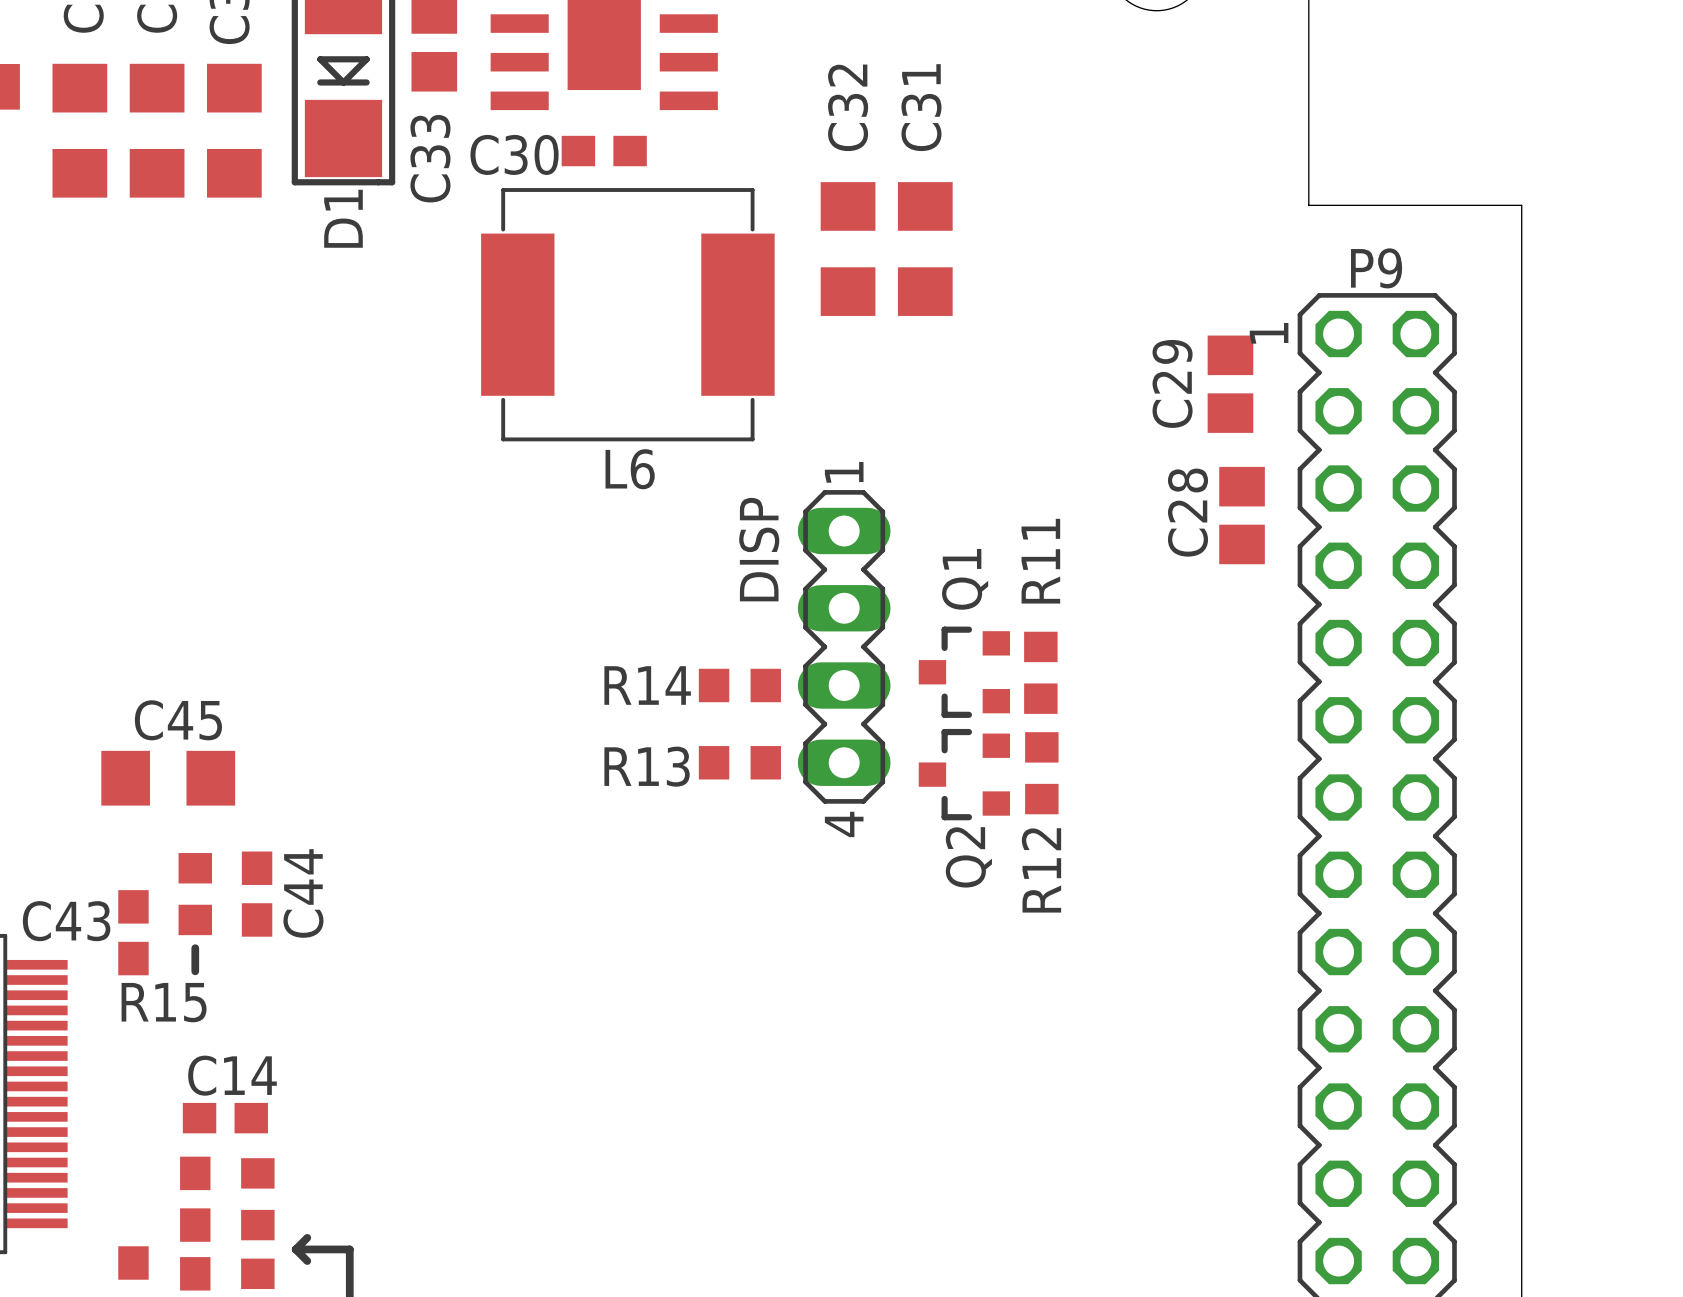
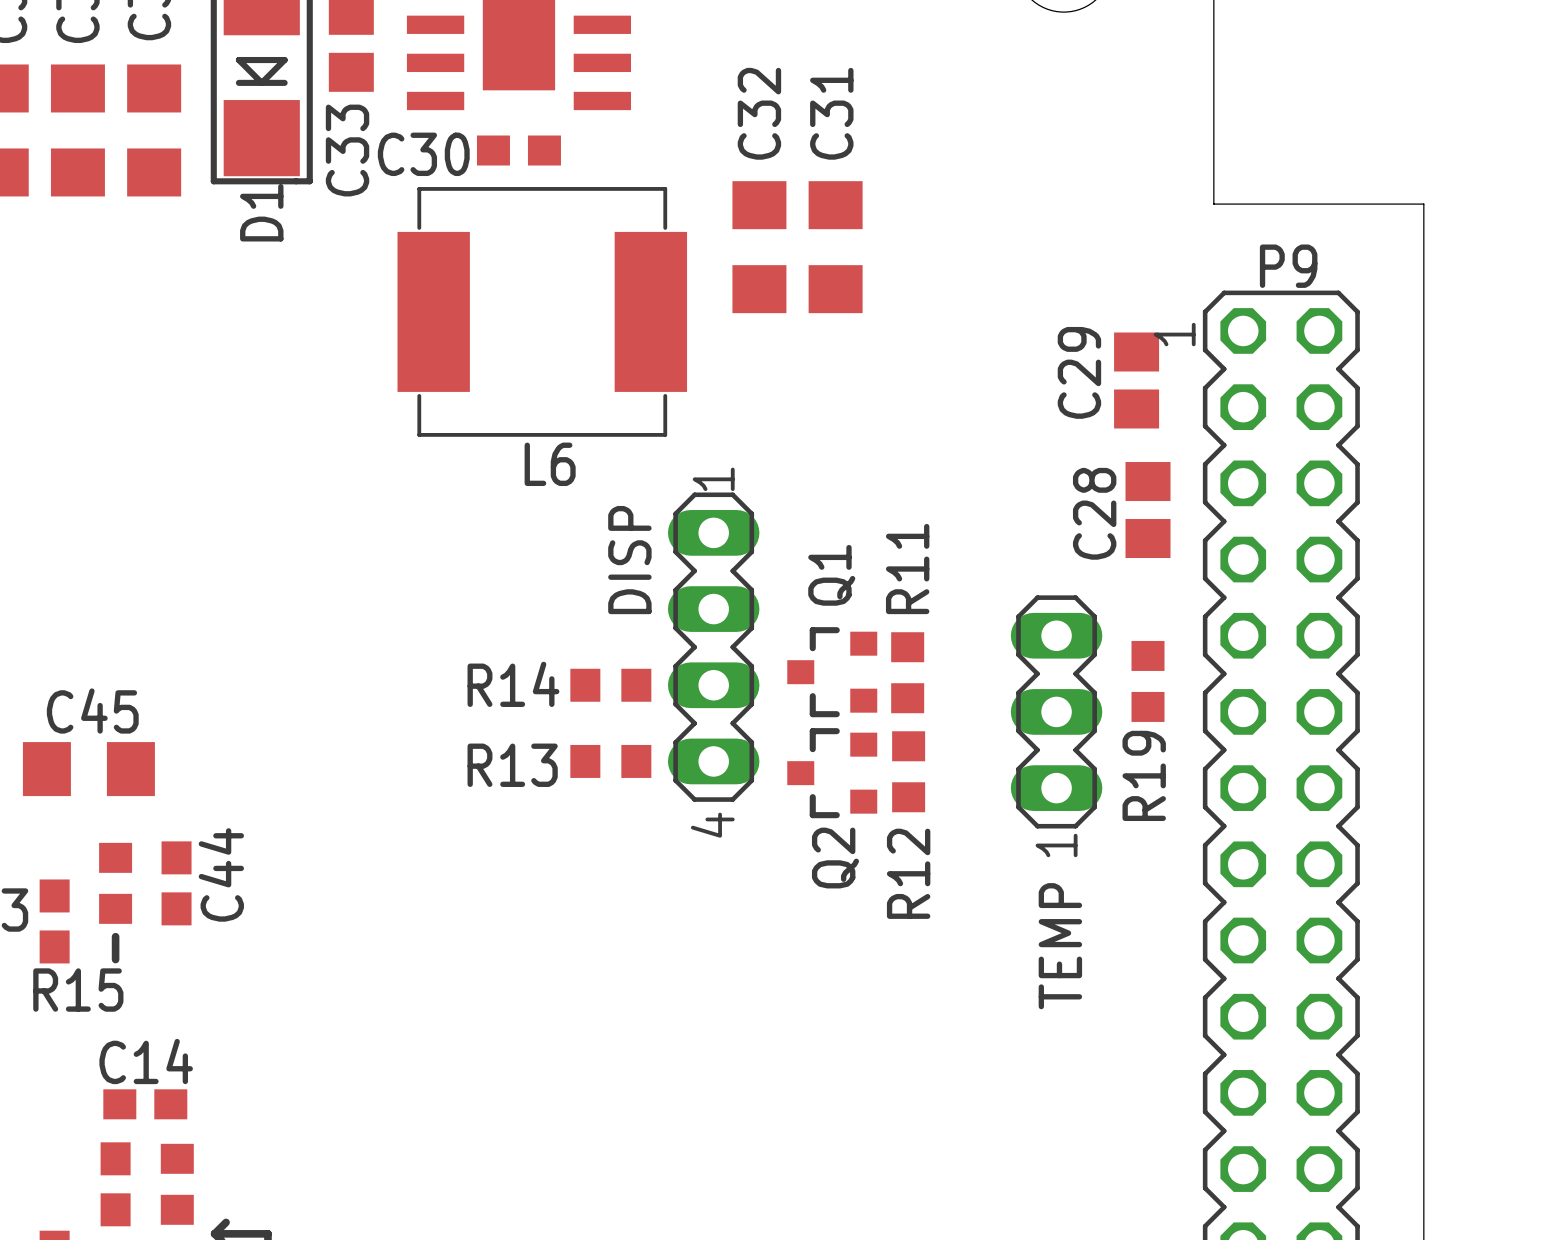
DISP position: (844, 646) -> (713, 647)
Q1 position: (964, 672) -> (832, 672)
R11 position: (1040, 672) -> (907, 672)
R14 position: (739, 685) -> (610, 685)
R19: none -> (1148, 681)
TEMP: none -> (1056, 711)
R13 position: (739, 762) -> (610, 761)
R12 position: (1041, 773) -> (908, 771)
Q2 position: (964, 774) -> (832, 773)

